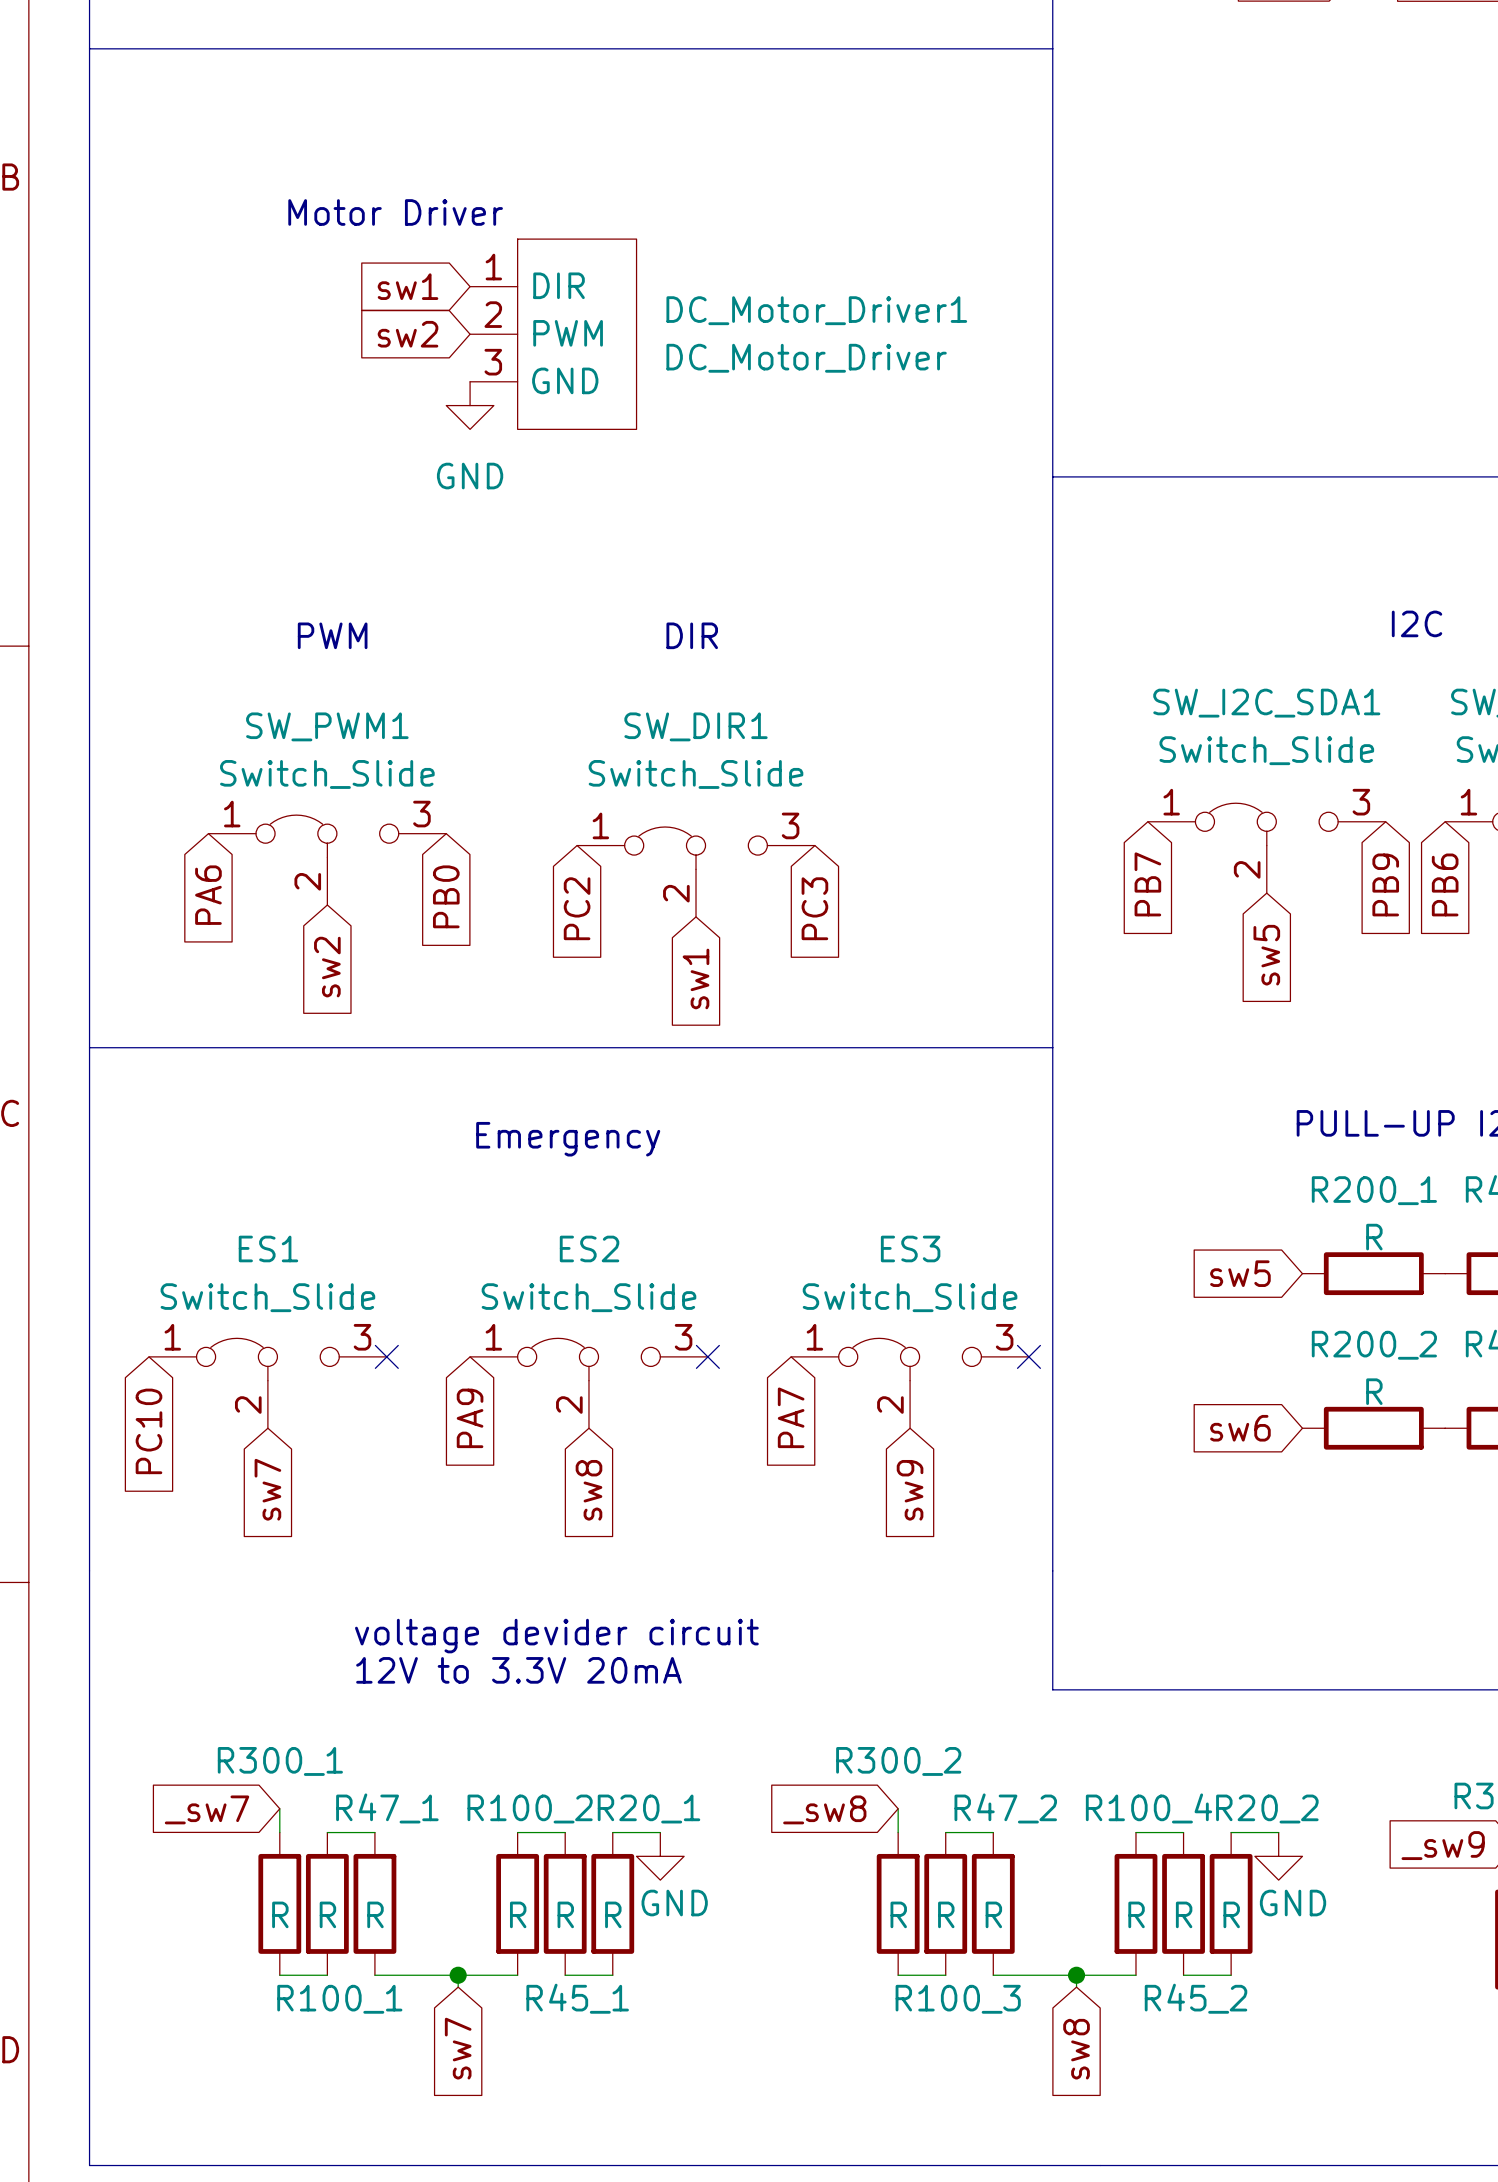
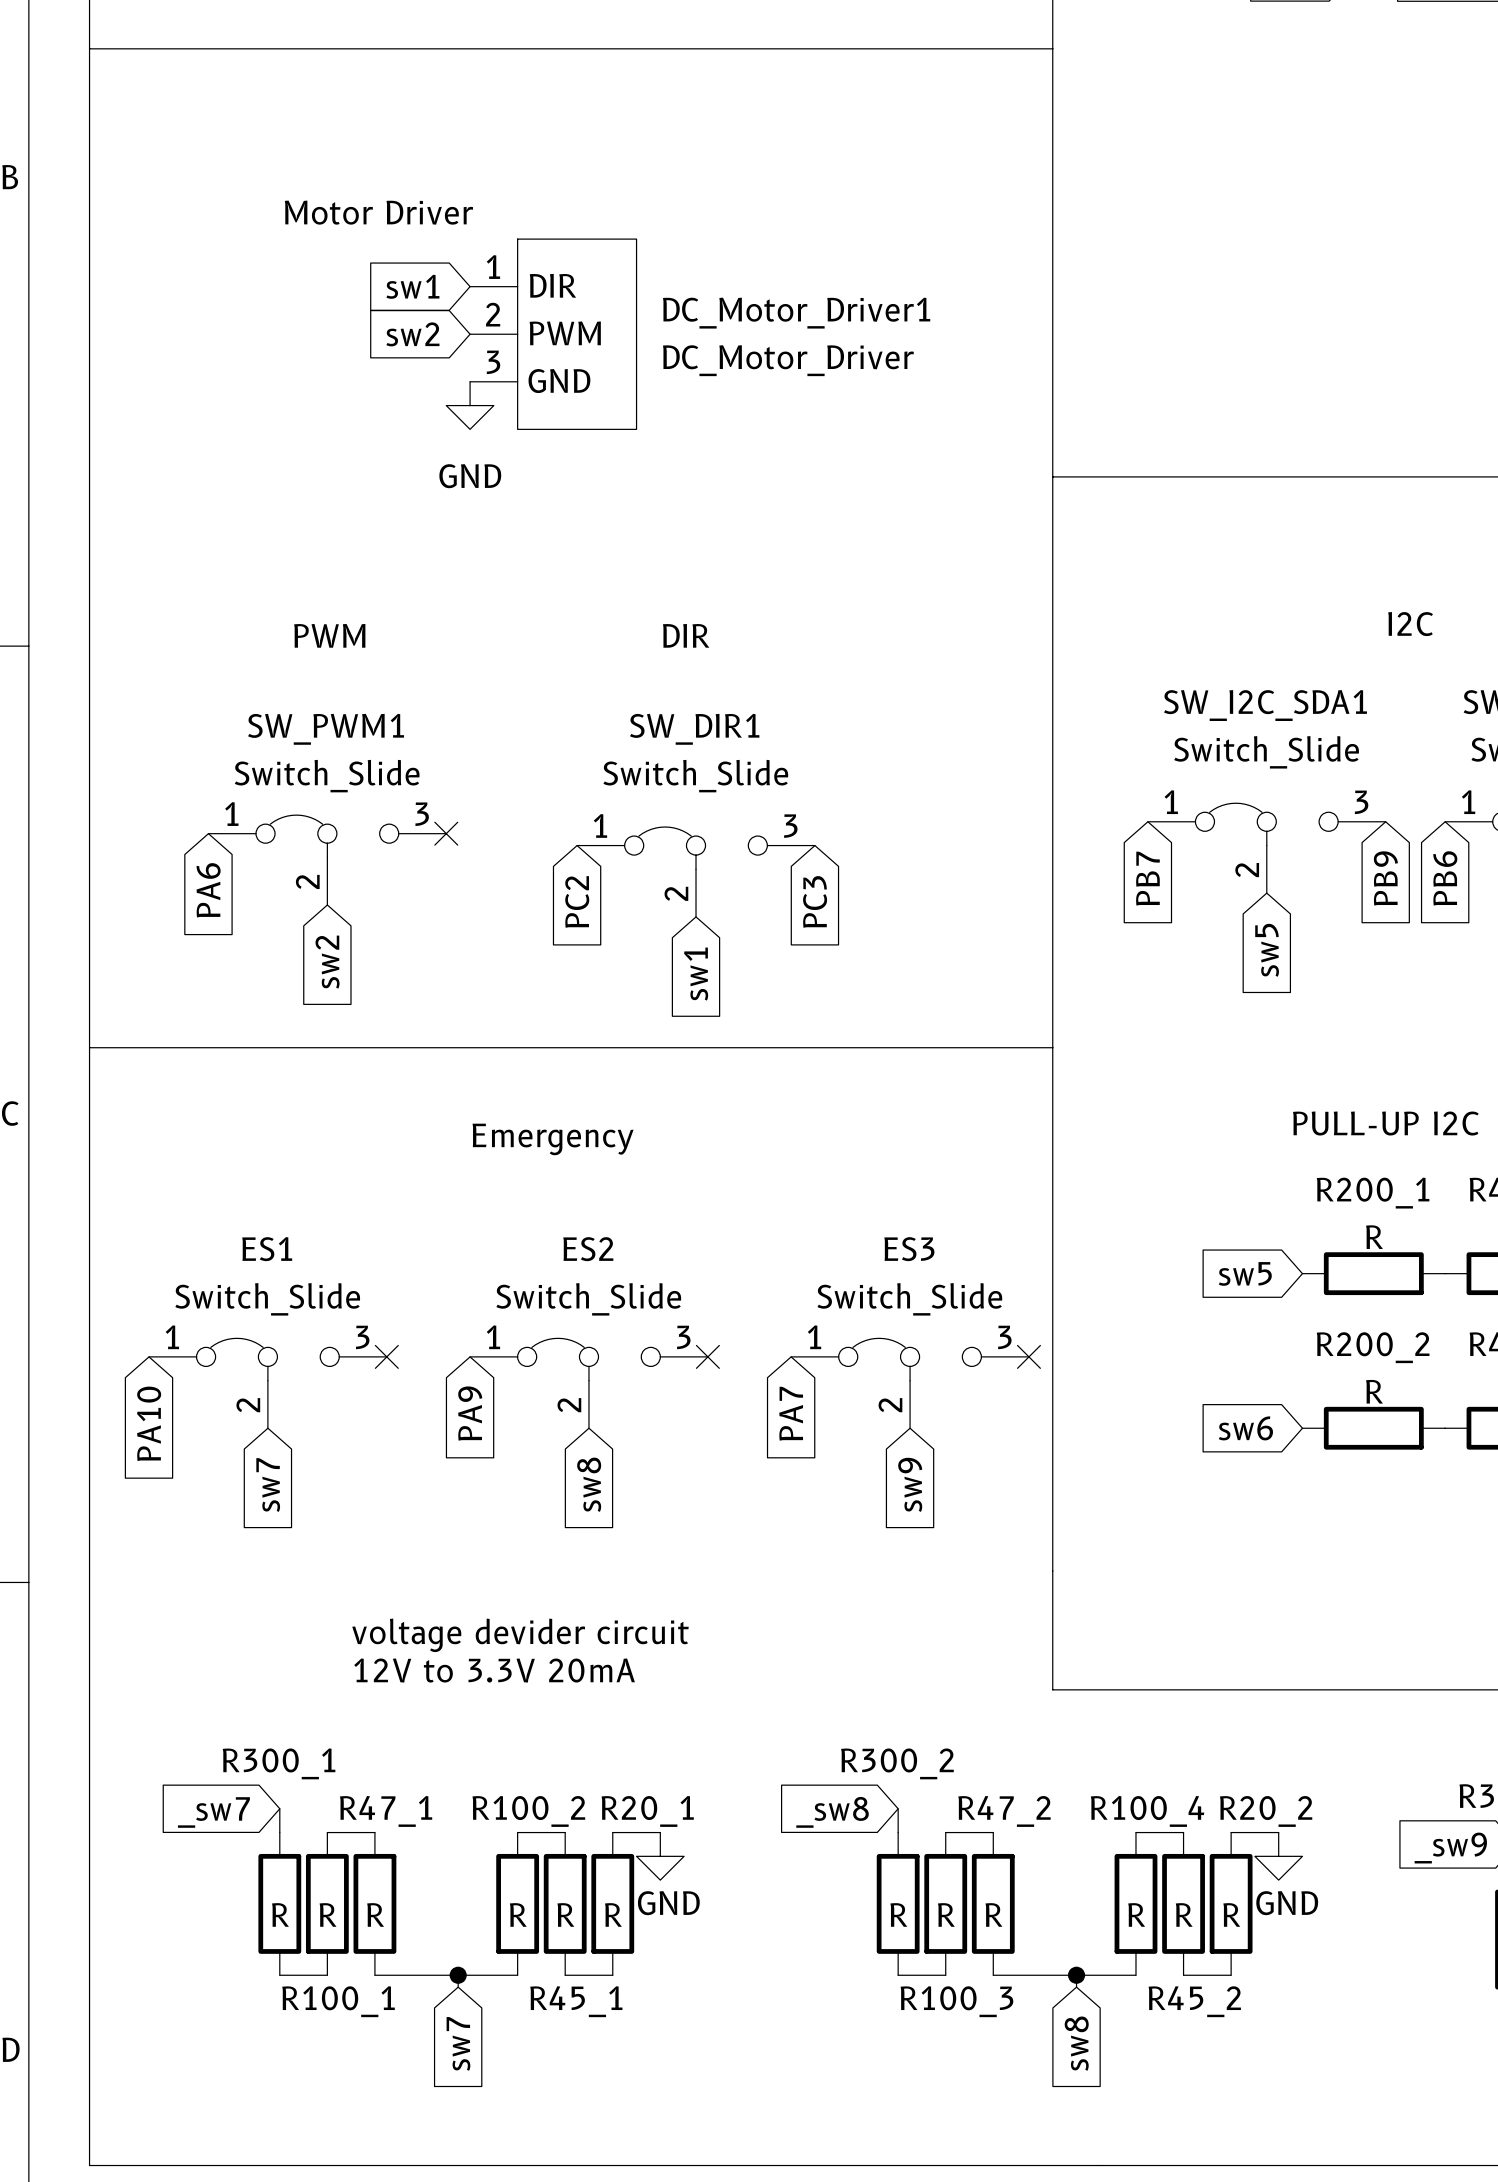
no-connect mark: none -> (446, 833)
global label: PB0 (446, 896) -> none
global label: PC10 (148, 1431) -> PA10 (149, 1423)

